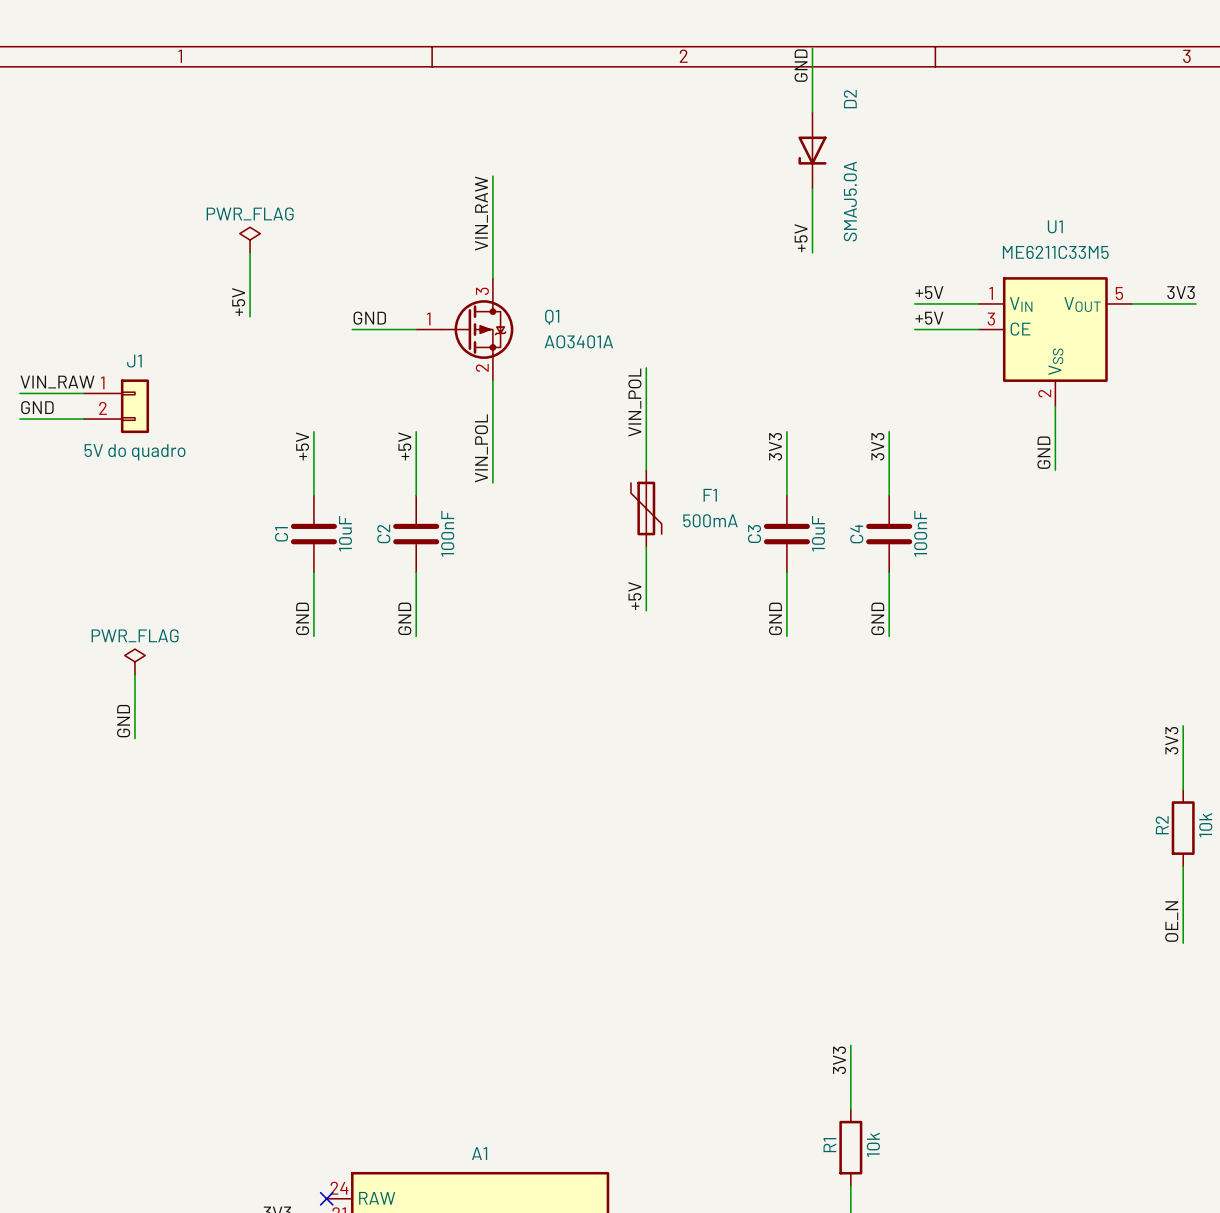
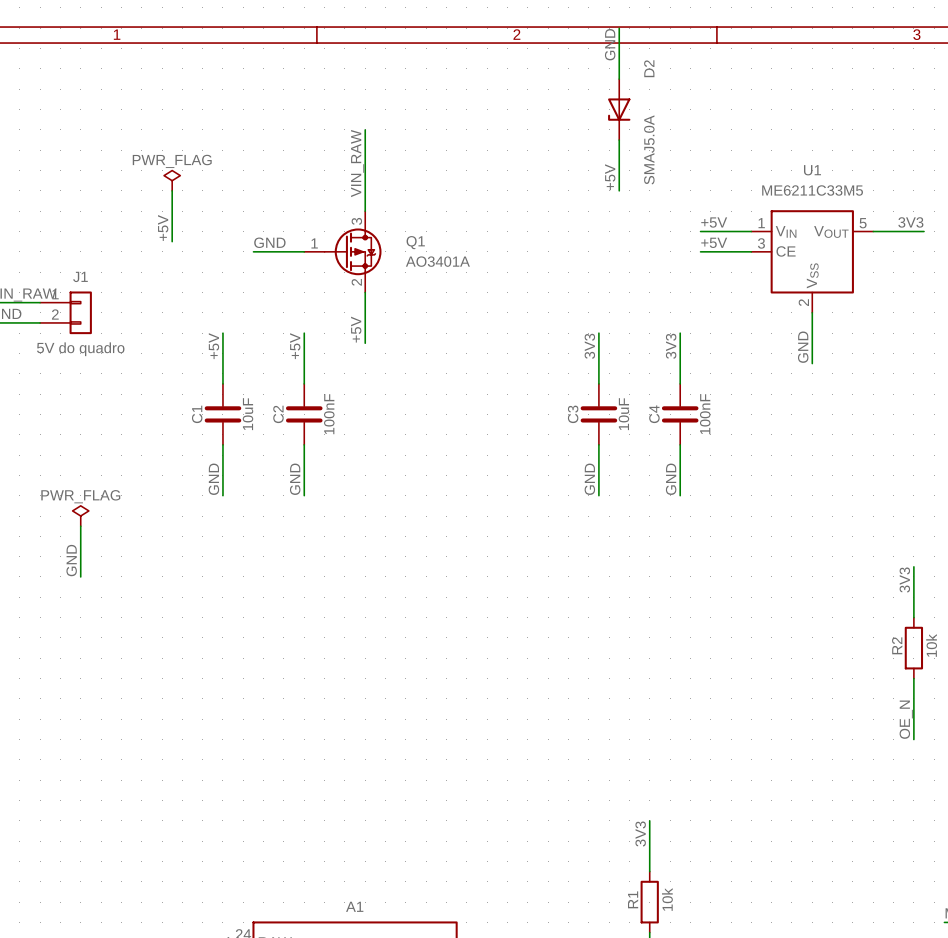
wire: (646, 367) (646, 470) -> none
label: VIN_POL (634, 402) -> none
wire: (492, 444) (492, 482) -> none
label: VIN_POL (481, 448) -> none
F1: 500mA (646, 508) -> none
wire: (646, 546) (646, 610) -> none
label position: +5V (634, 596) -> +5V (356, 329)

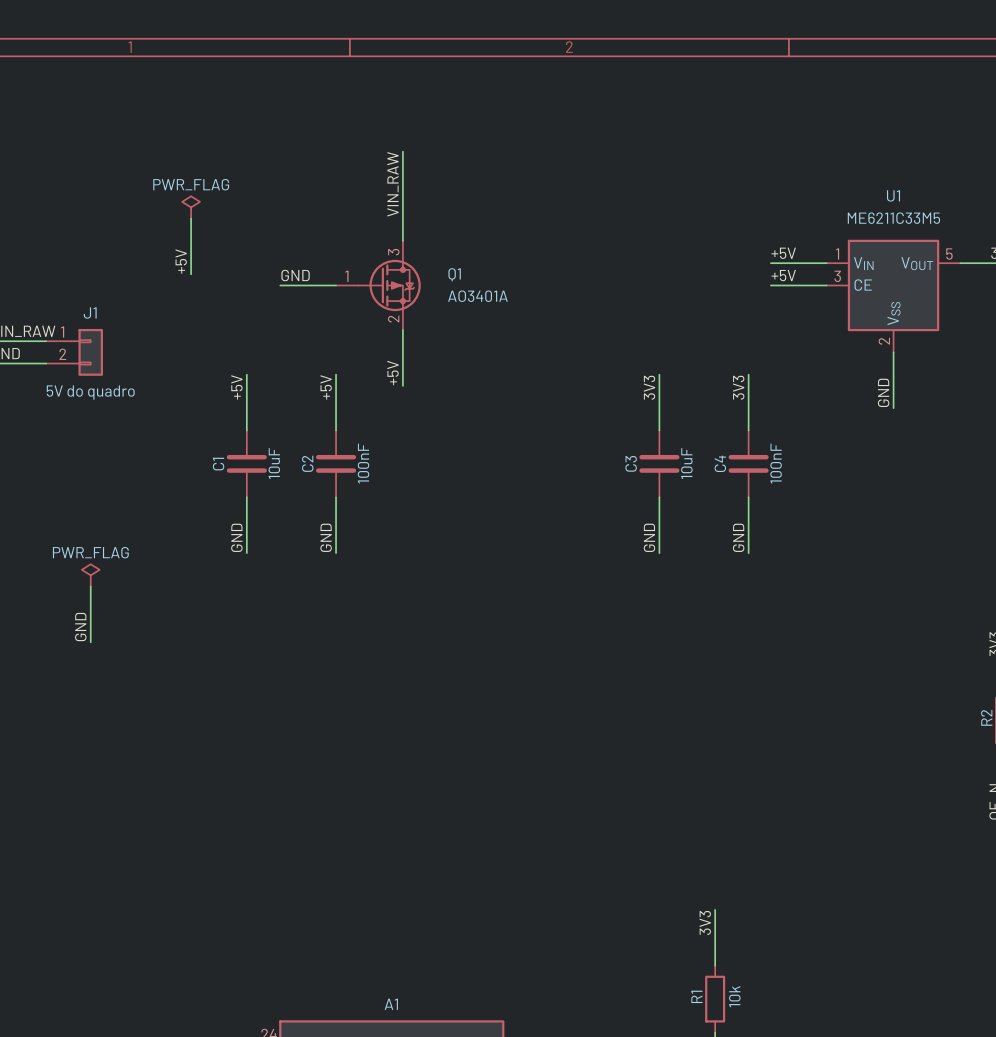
wire: (619, 28) (619, 79) -> none
label: GND (610, 44) -> none
D2: SMAJ5.0A (619, 109) -> none
wire: (619, 140) (619, 190) -> none
label: +5V (610, 177) -> none

